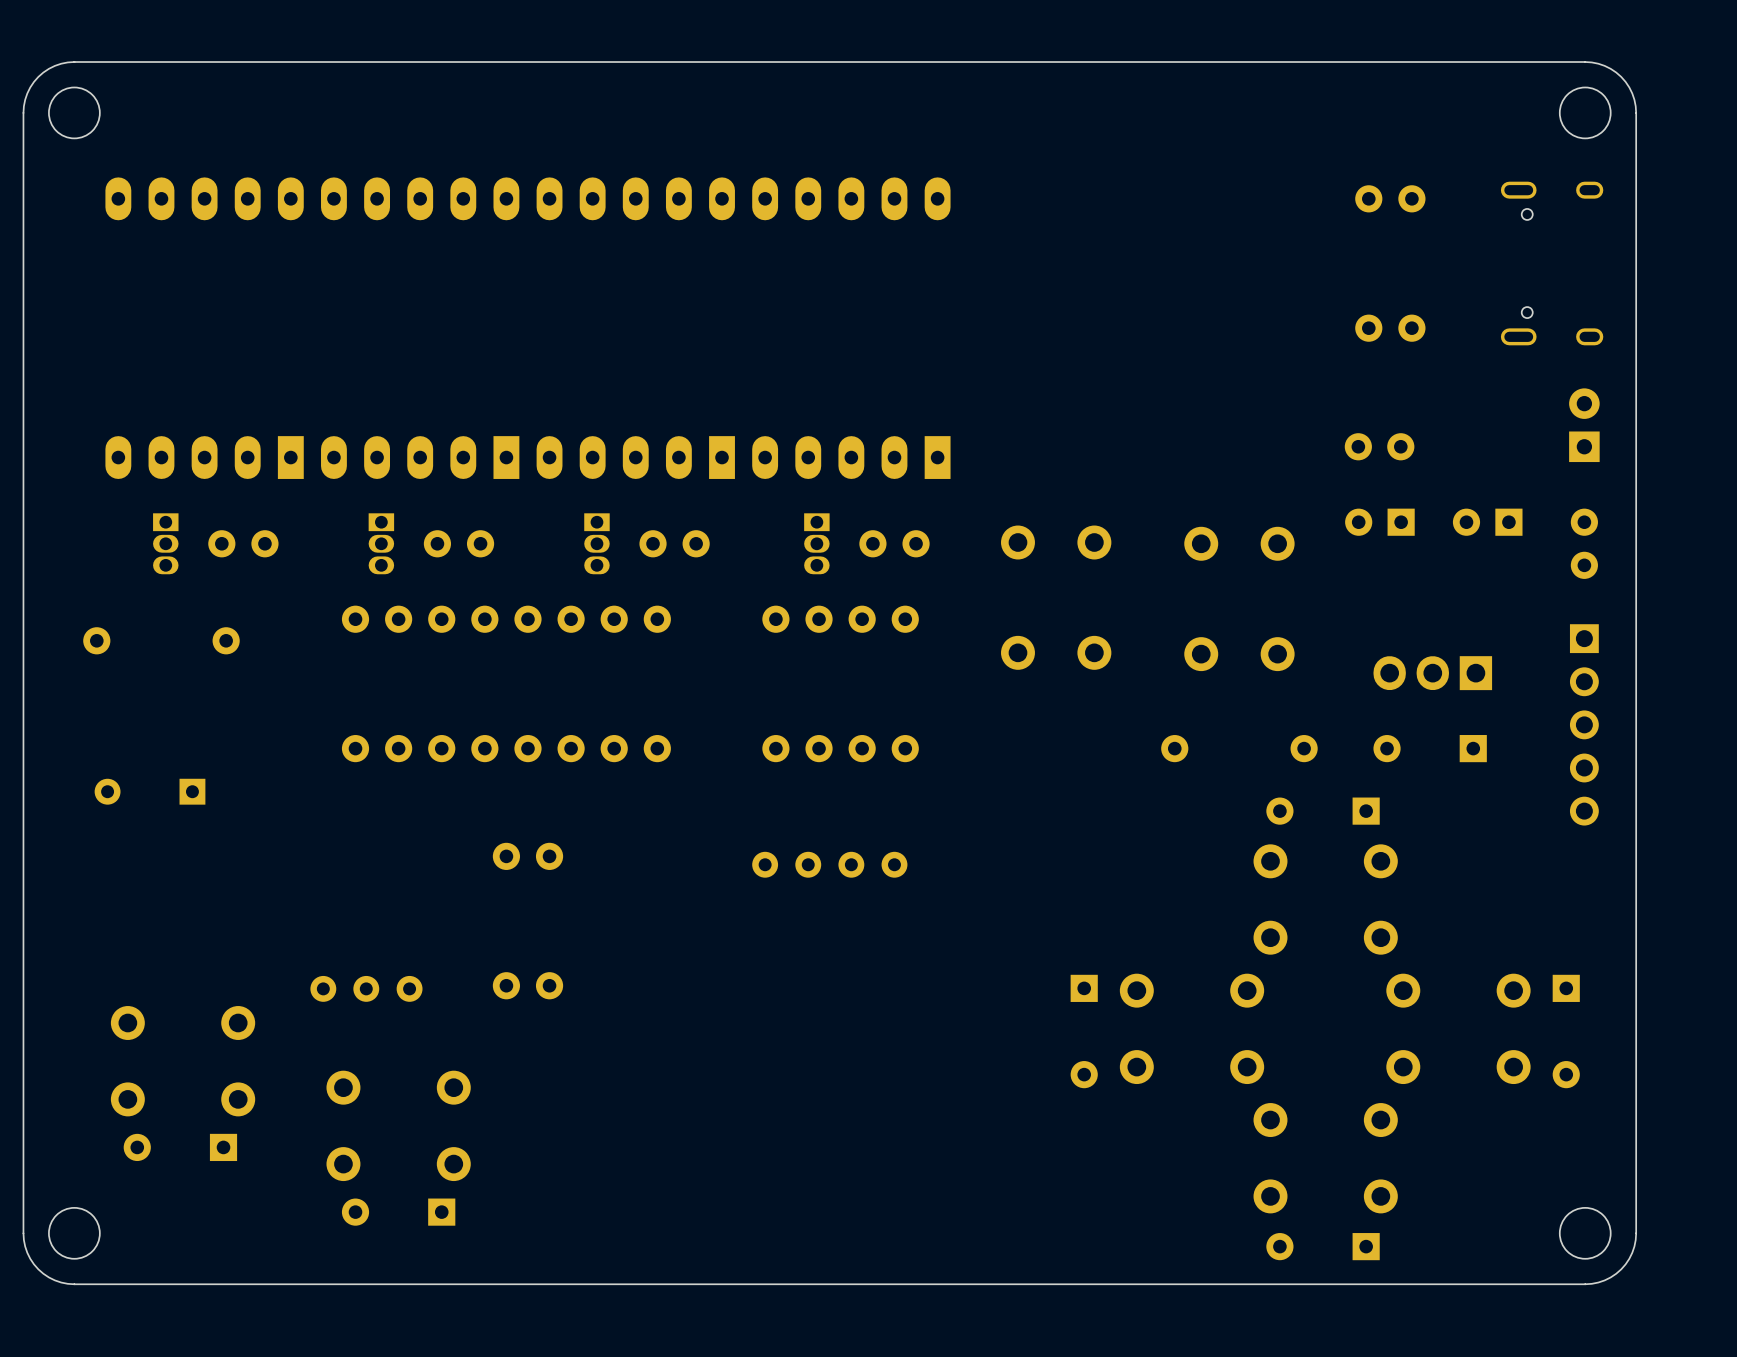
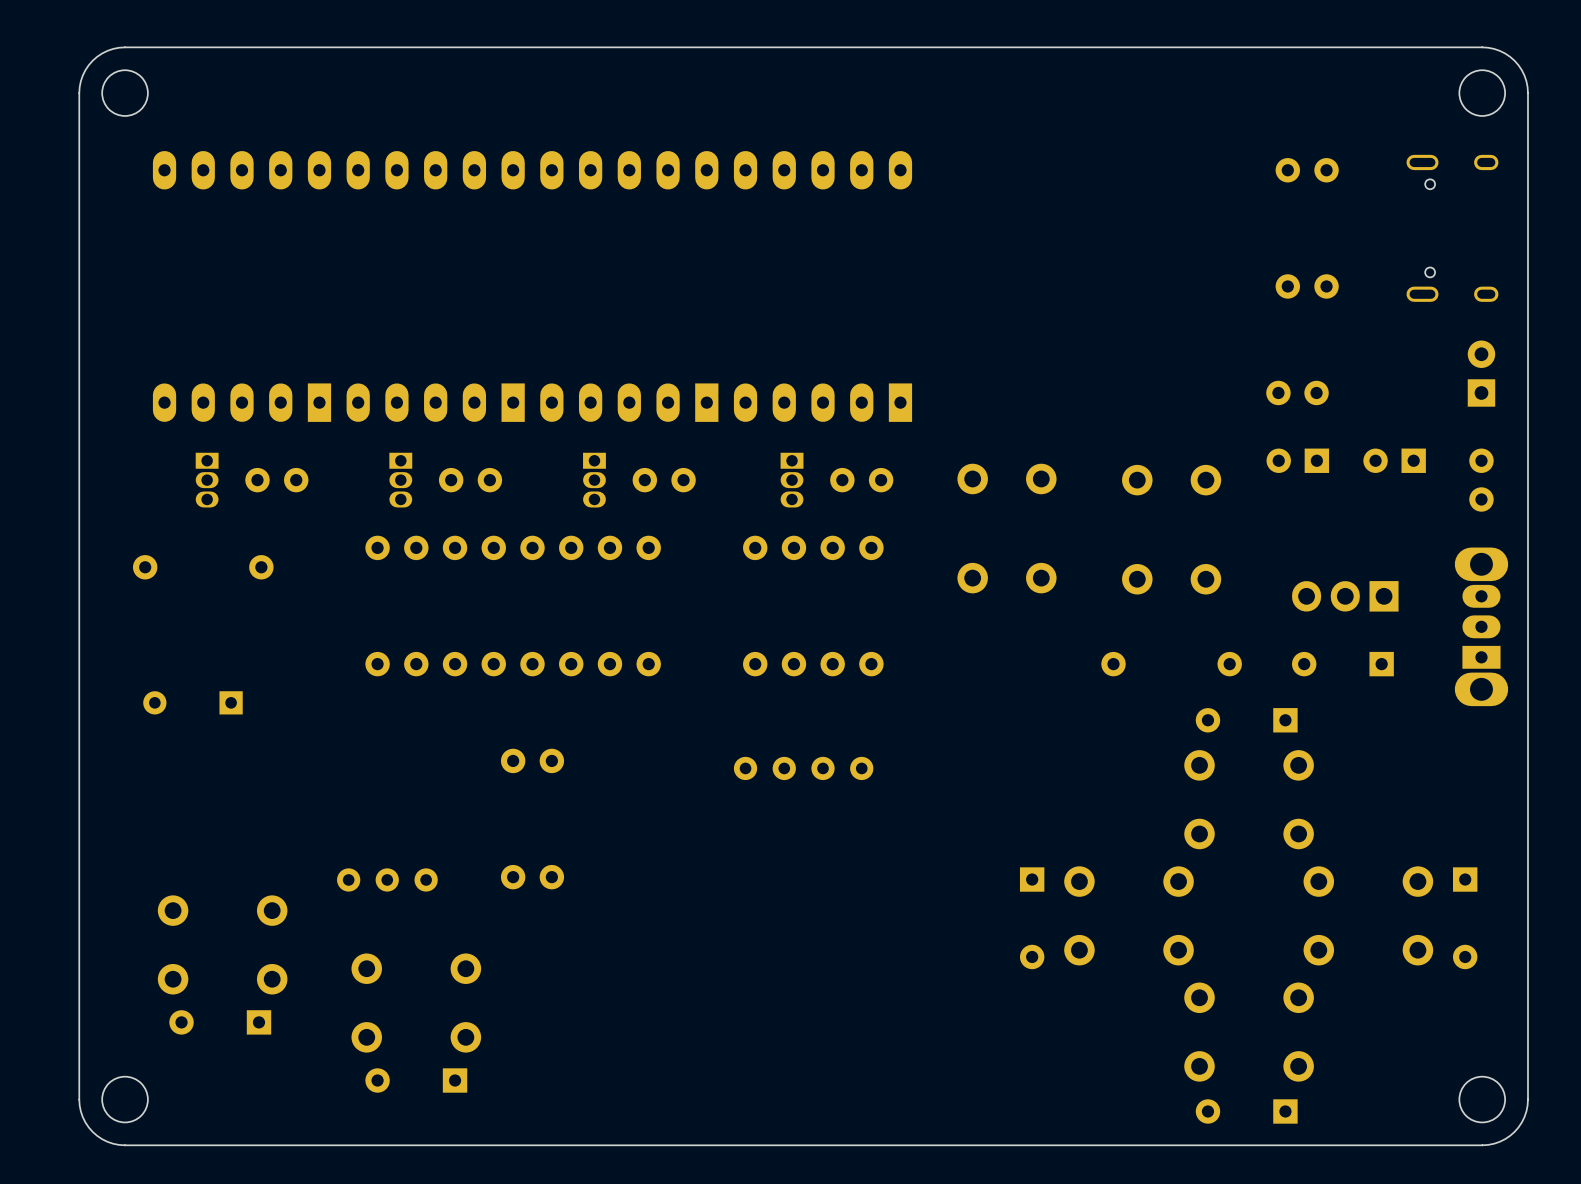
part: none -> (1481, 626)
part: (1584, 724) -> none

